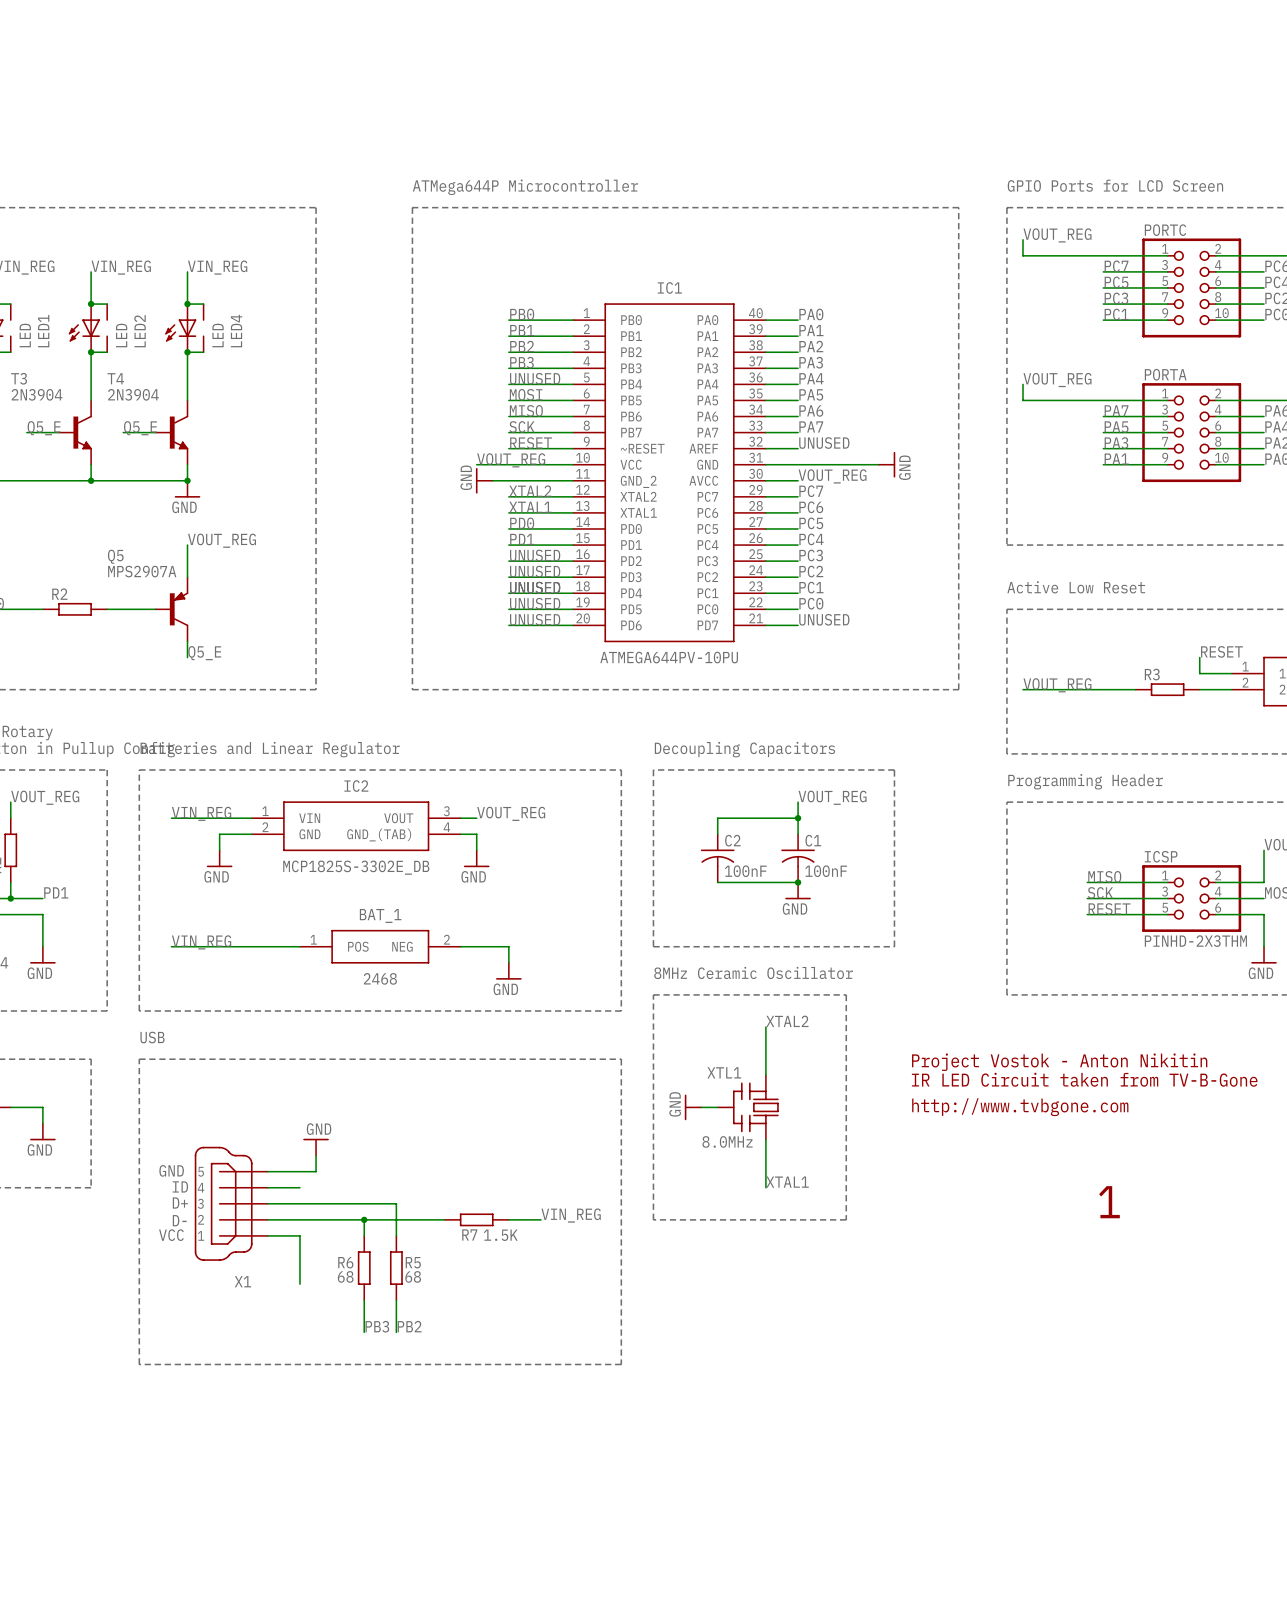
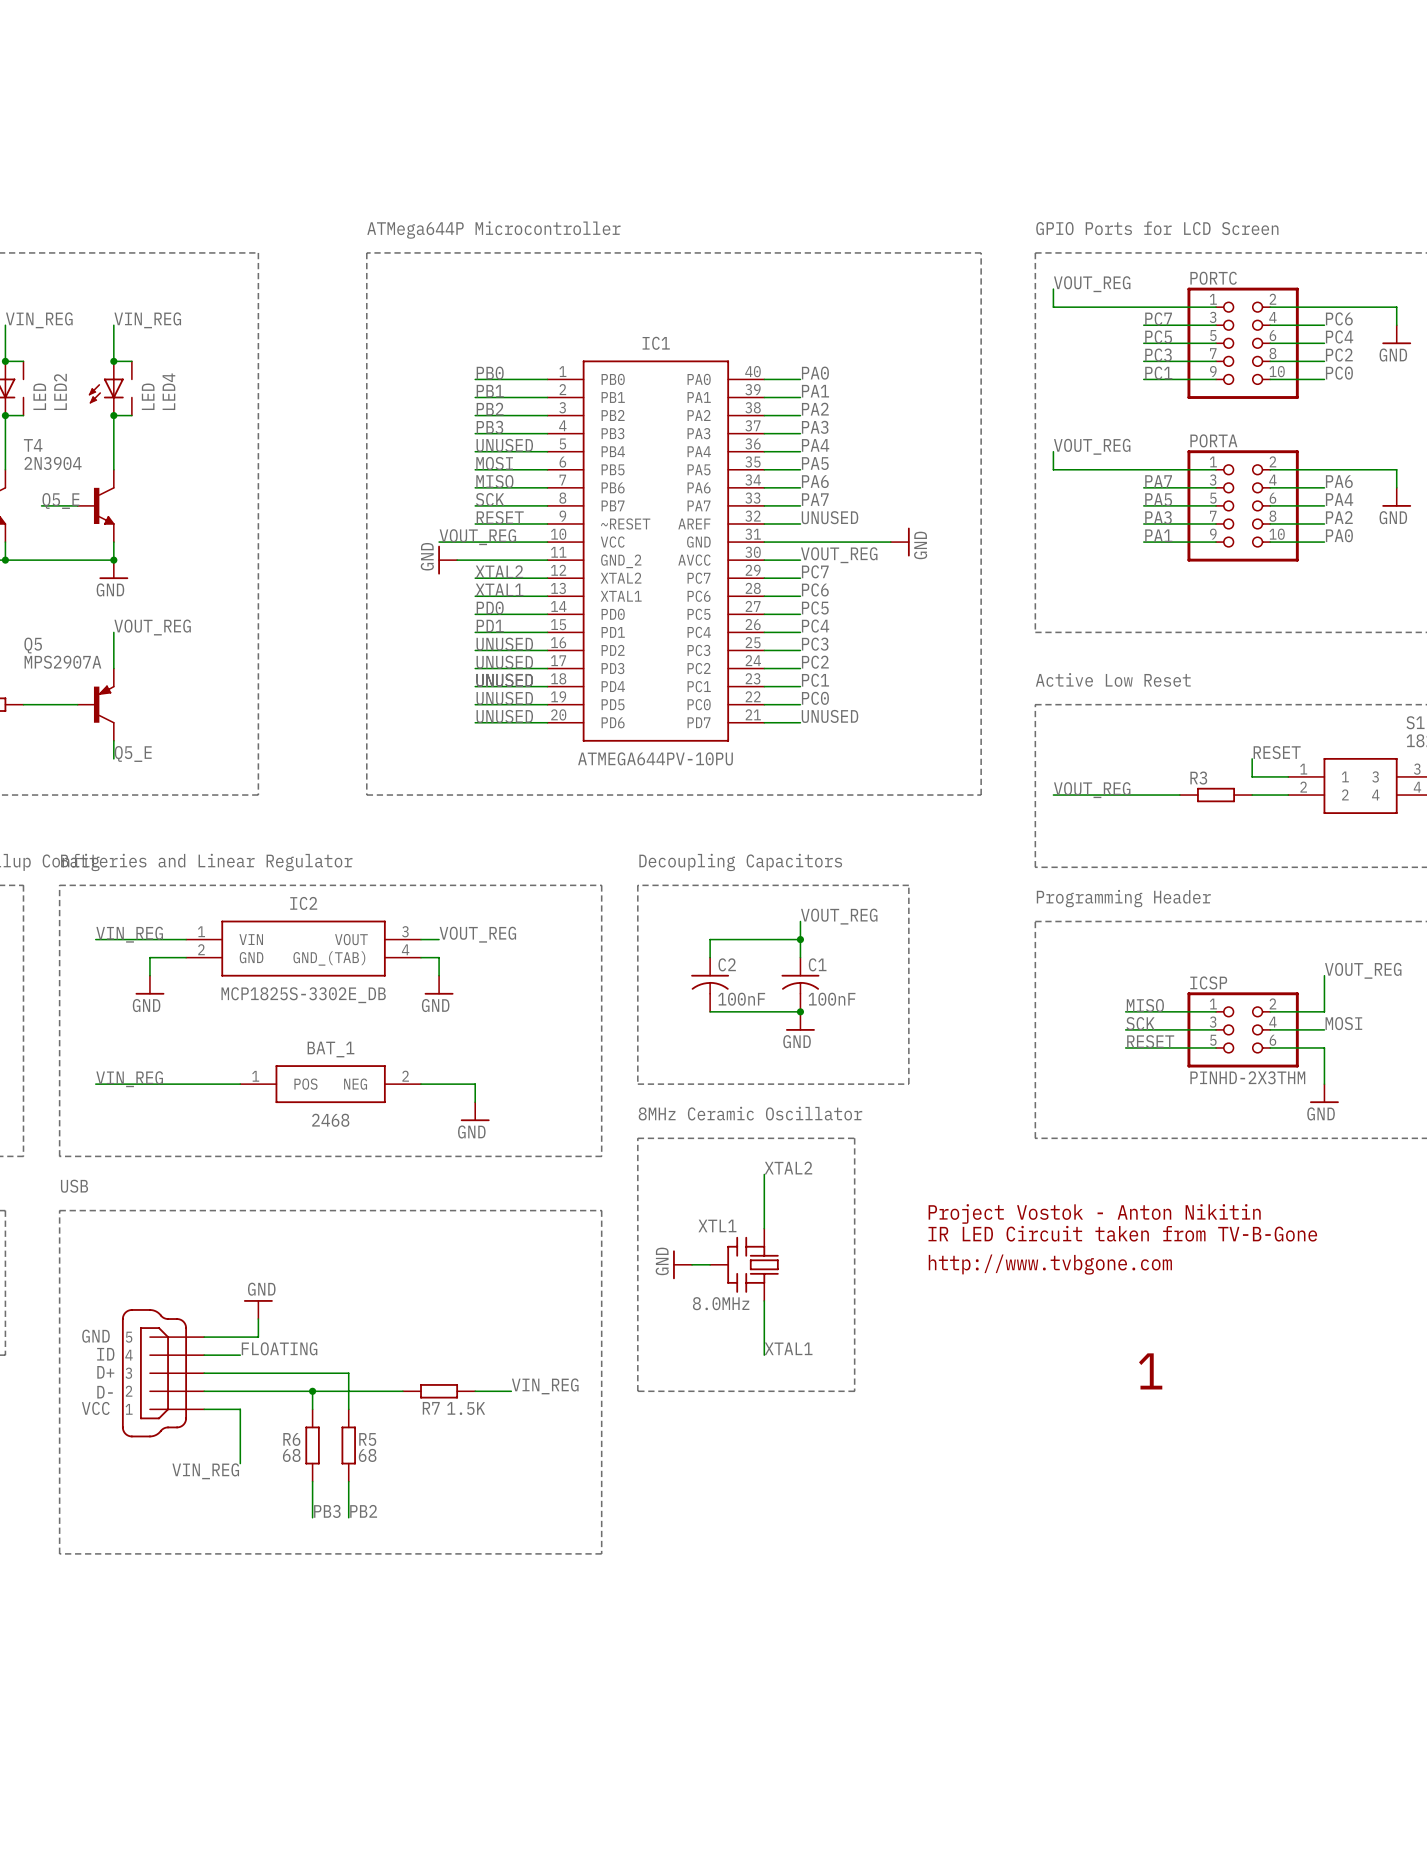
text: none -> FLOATING (279, 1348)
X1 name: X1 (242, 1281) -> none
label: none -> VIN_REG (205, 1471)

